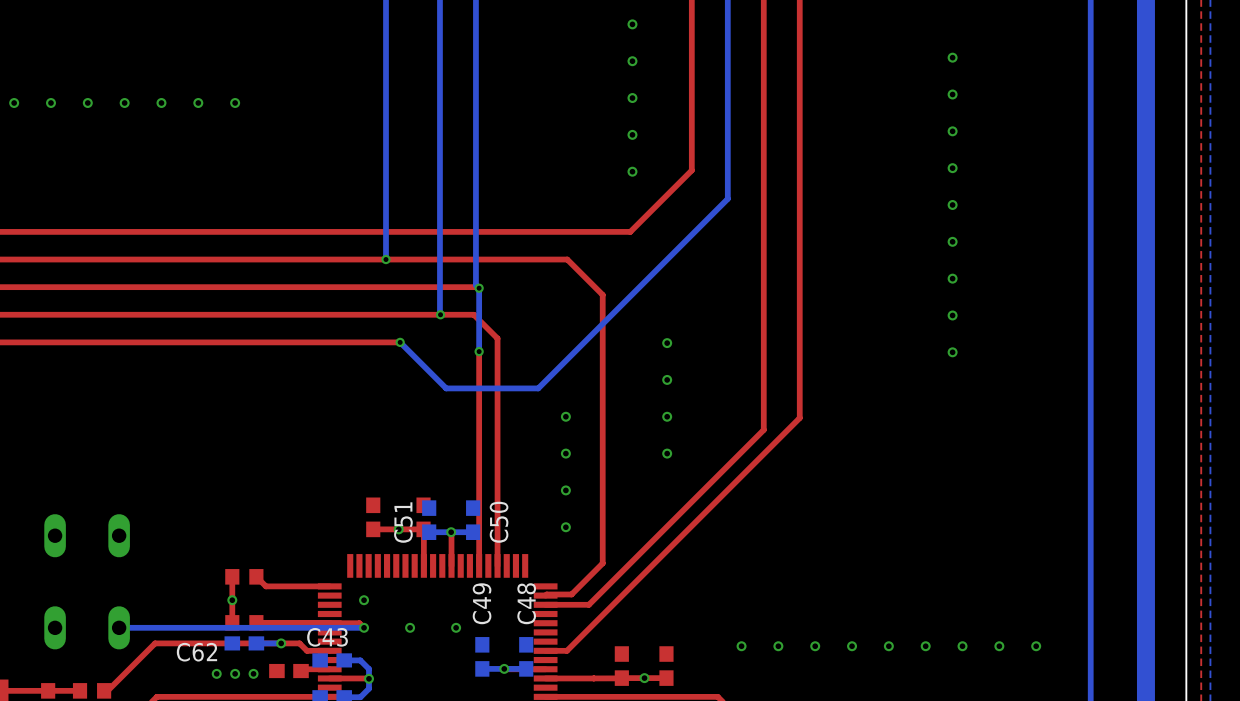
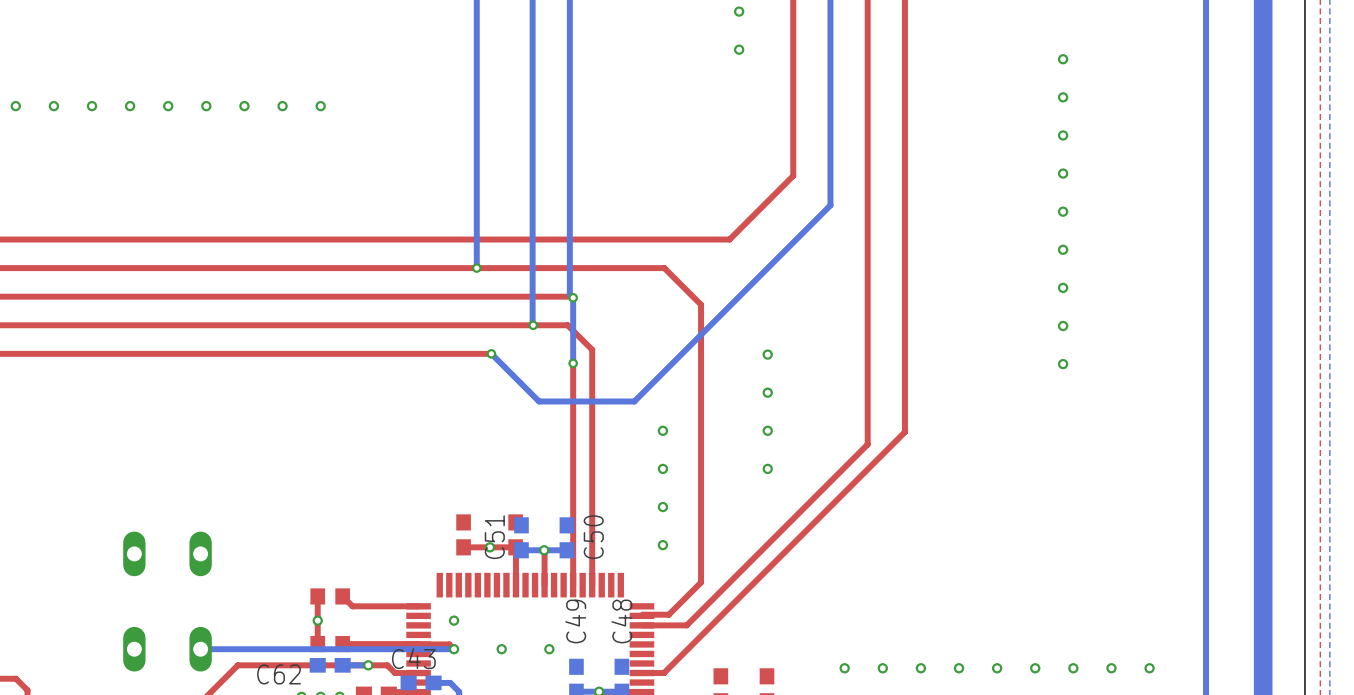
via: none -> (739, 11)
via: (632, 24) -> none
via: none -> (739, 49)
via: (632, 61) -> none
via: (632, 98) -> none
via: (632, 134) -> none
via: (632, 171) -> none

